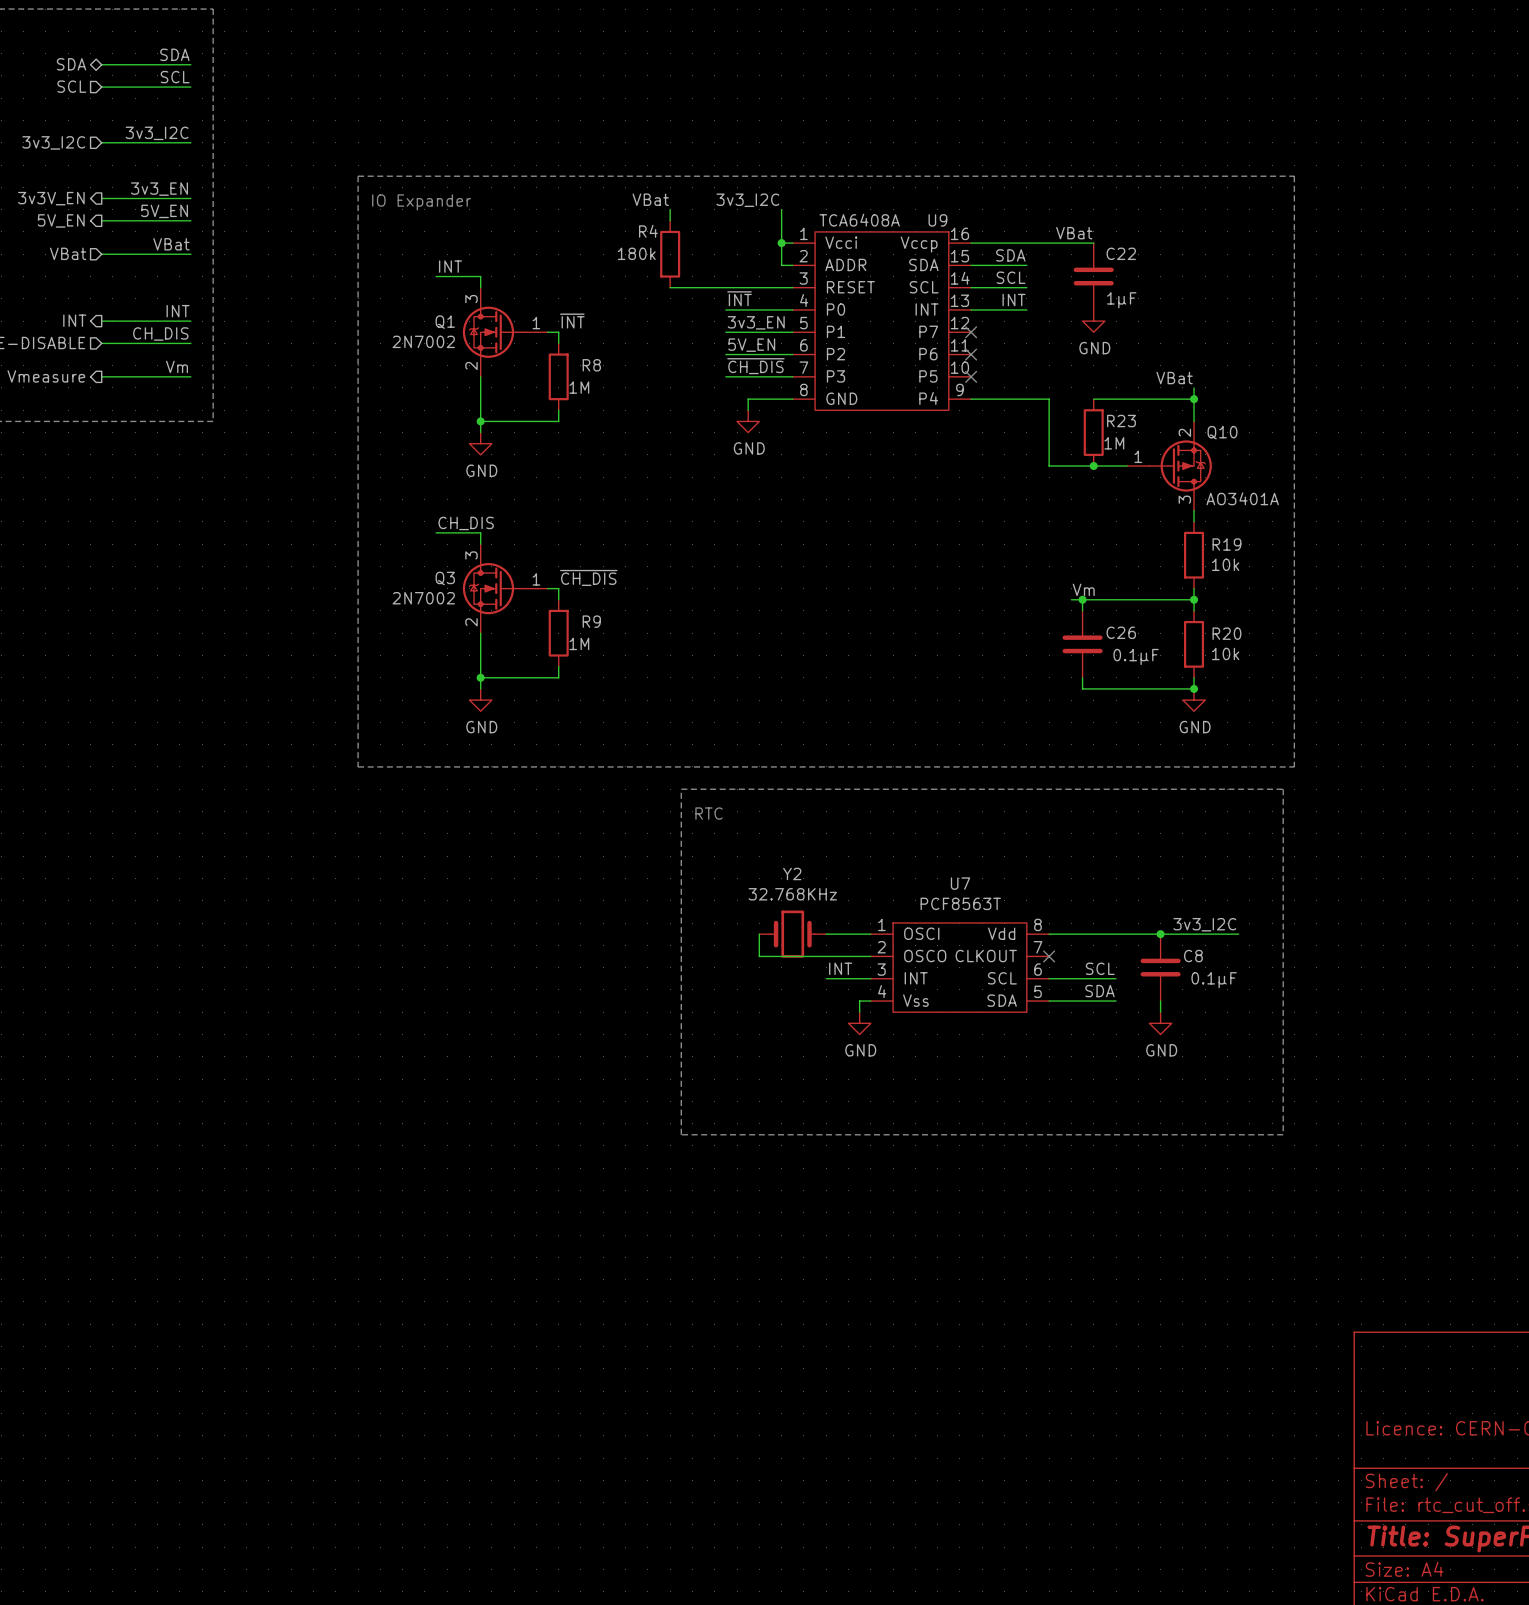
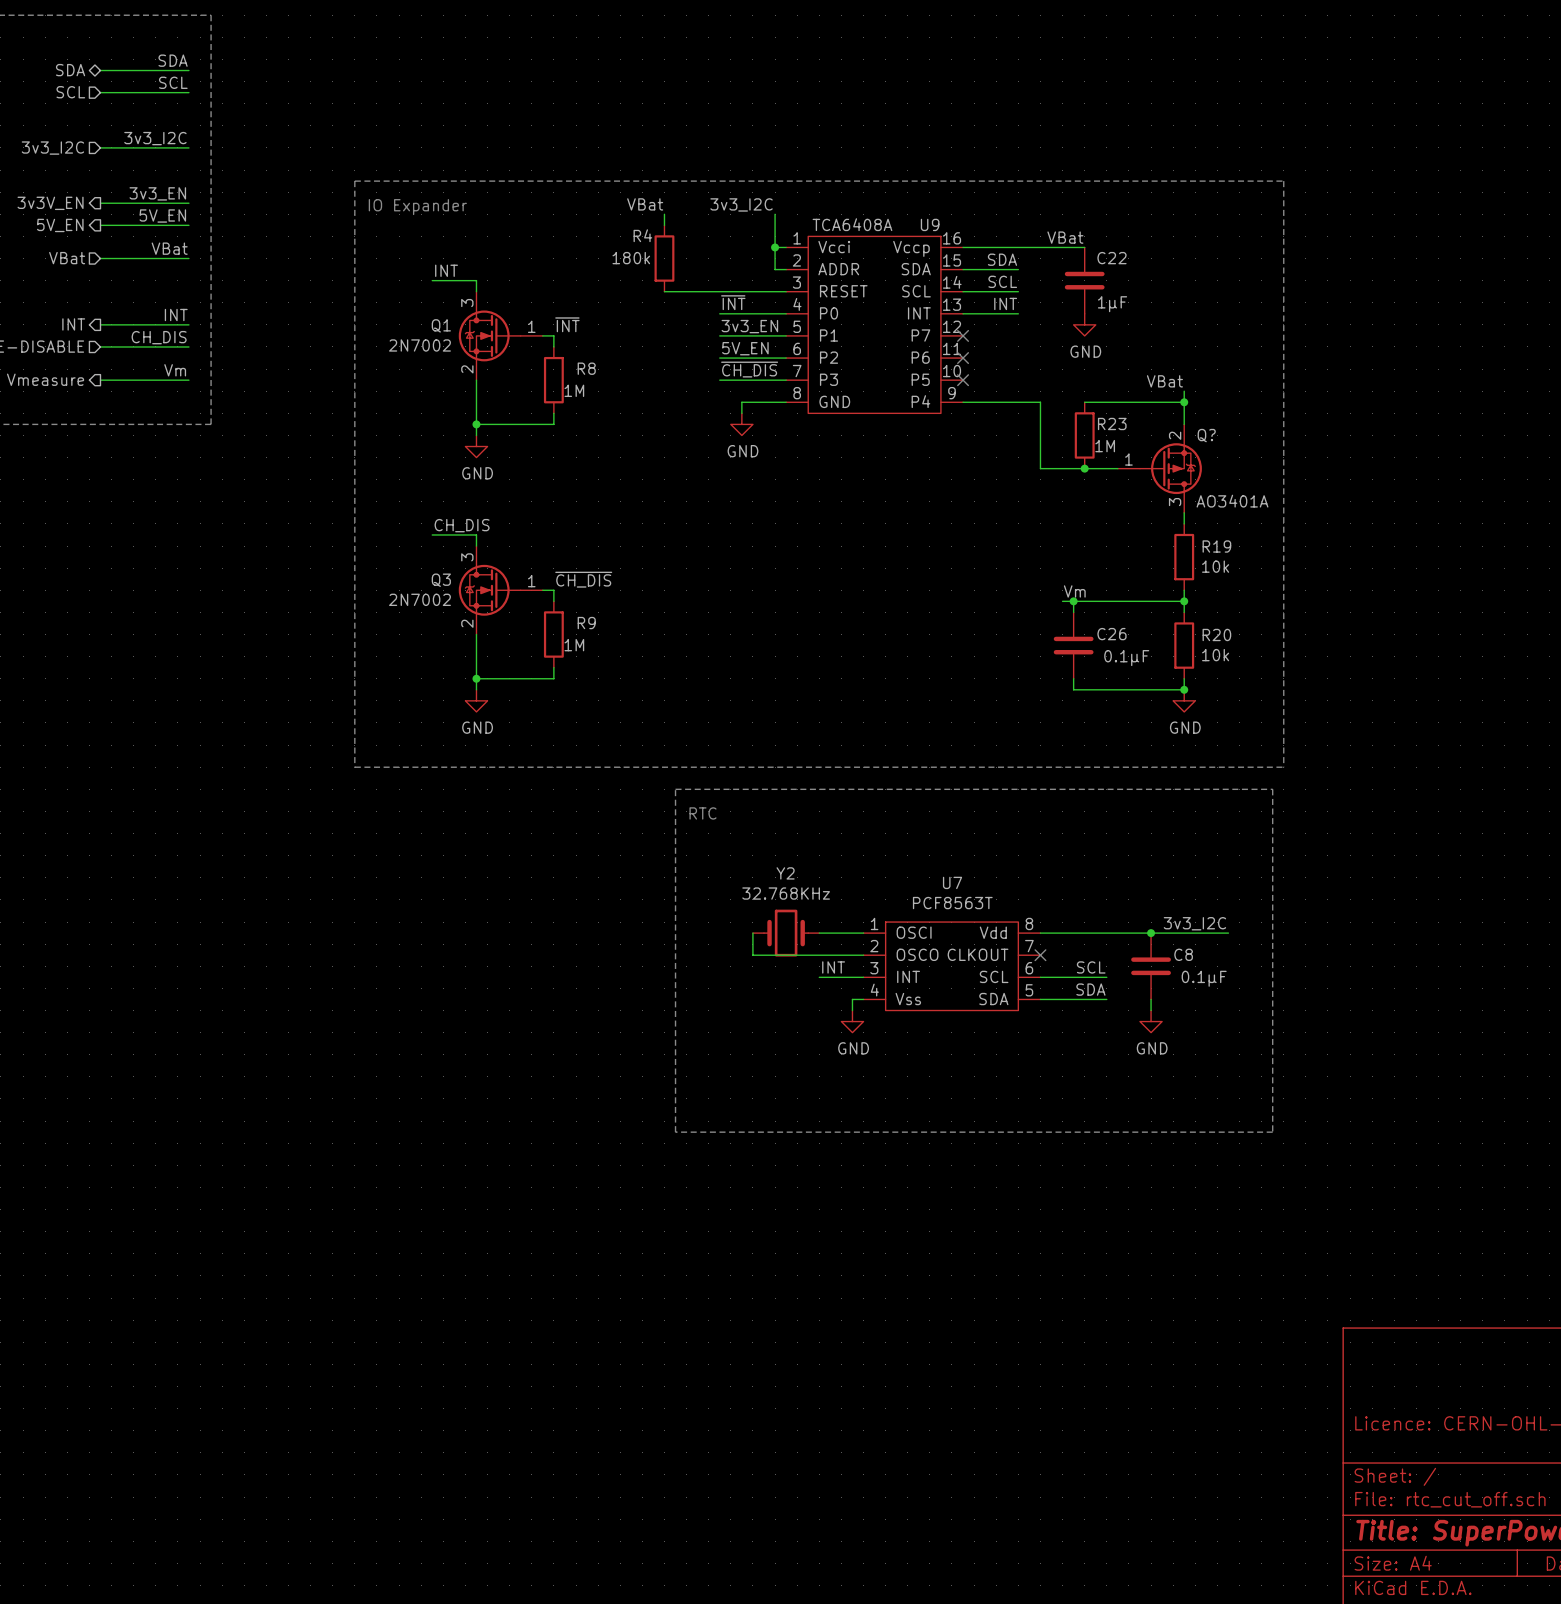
Q10 name: Q10 (1222, 432) -> Q? (1206, 435)

